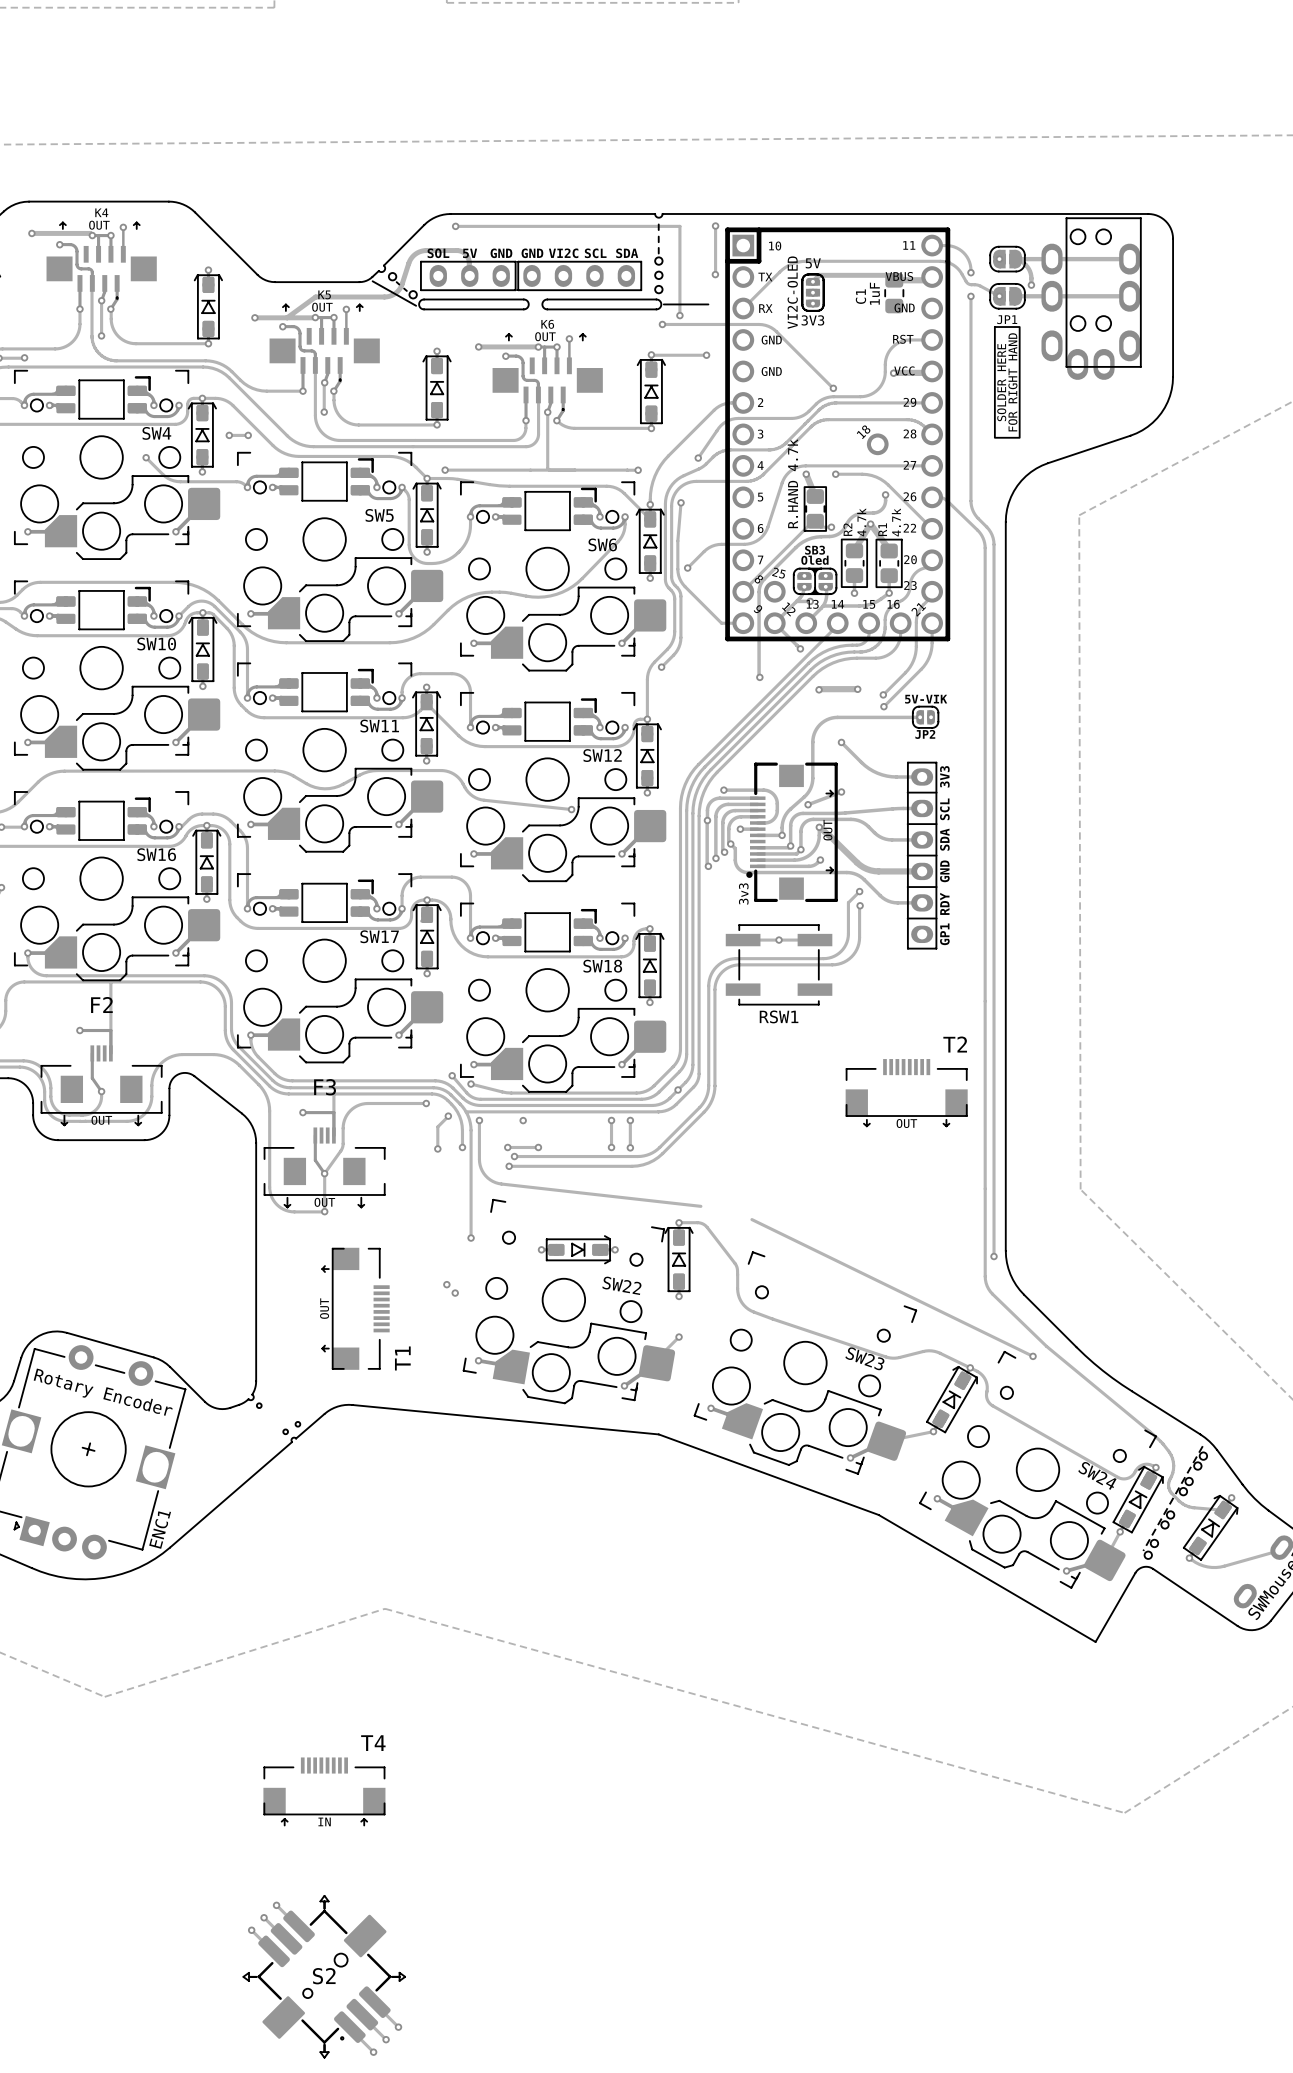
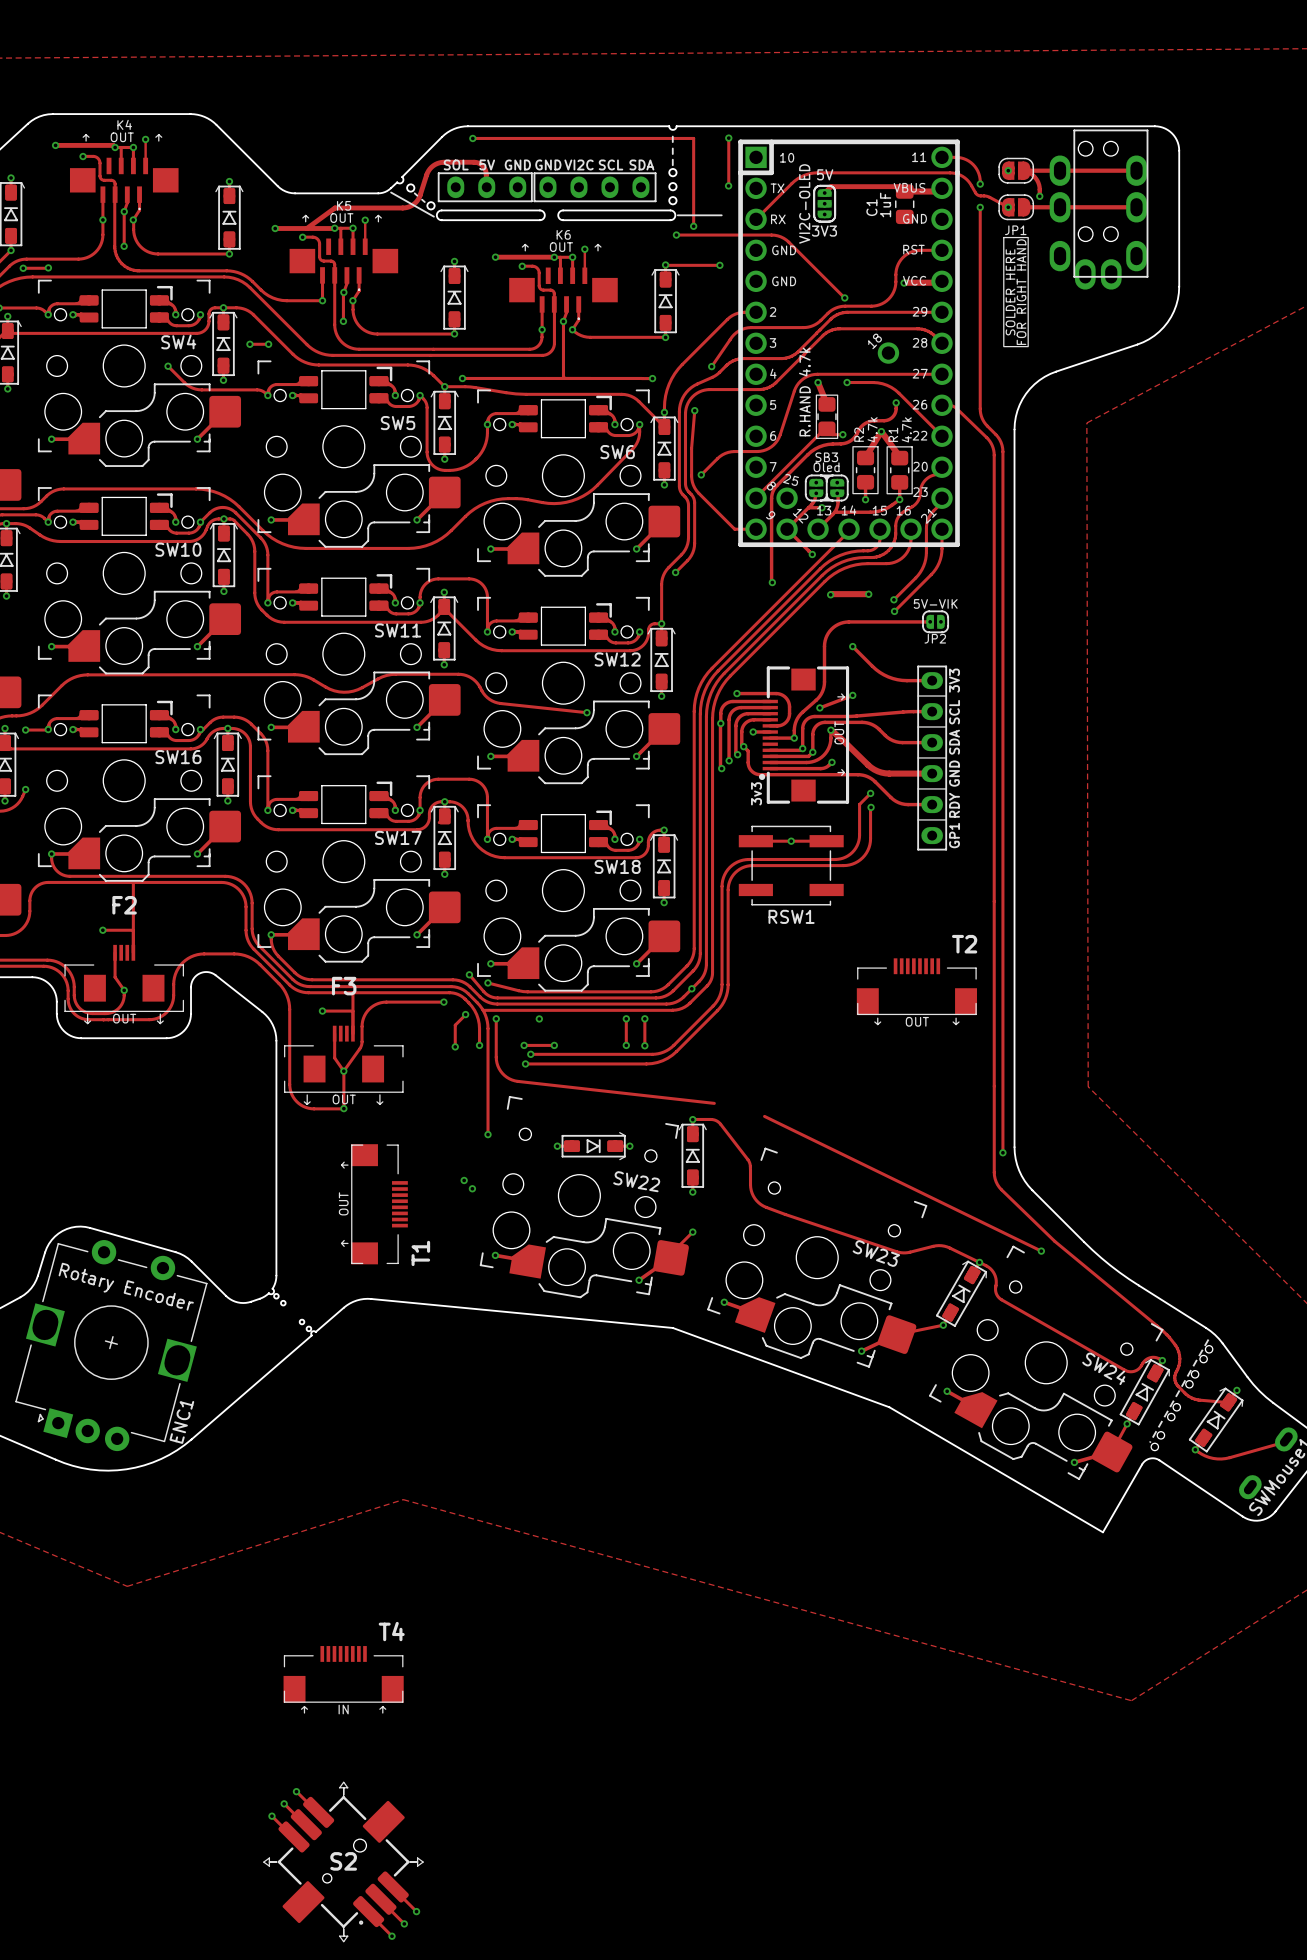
round board edge: none -> [273, 1293, 280, 1300]
round board edge: [255, 1402, 263, 1409] -> none
round board edge: none -> [280, 1299, 287, 1307]
round board edge: [294, 1421, 302, 1428] -> none
round board edge: none -> [298, 1318, 306, 1326]
round board edge: [282, 1428, 289, 1436] -> none
round board edge: none -> [305, 1325, 313, 1333]

